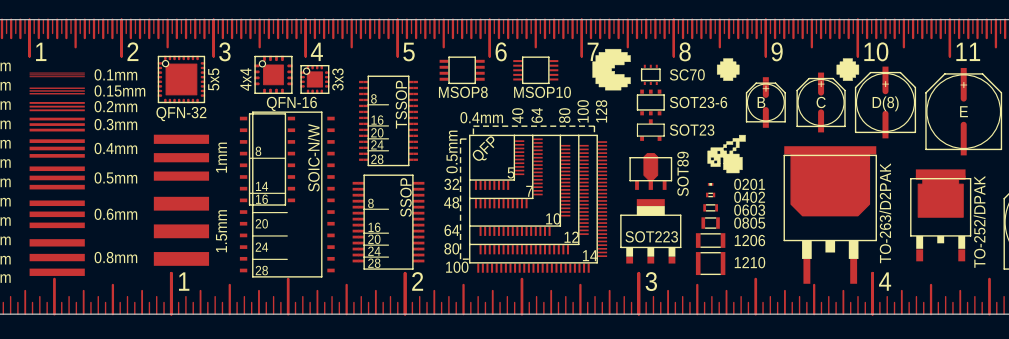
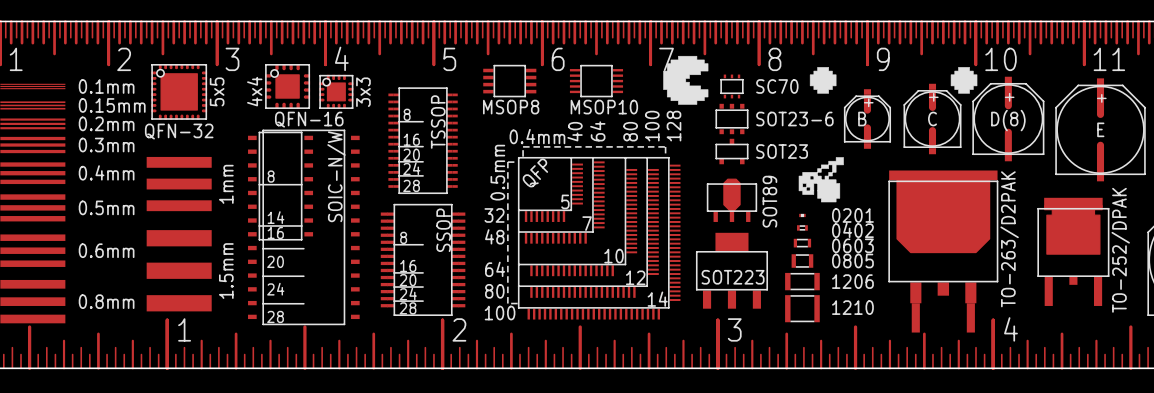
part footprint: [783, 146, 877, 284] -> [888, 170, 999, 333]
drawing: none -> [695, 178, 769, 309]
part footprint: [910, 169, 972, 262] -> [1037, 197, 1110, 306]
part: (650, 171) -> none
part: (650, 231) -> none

